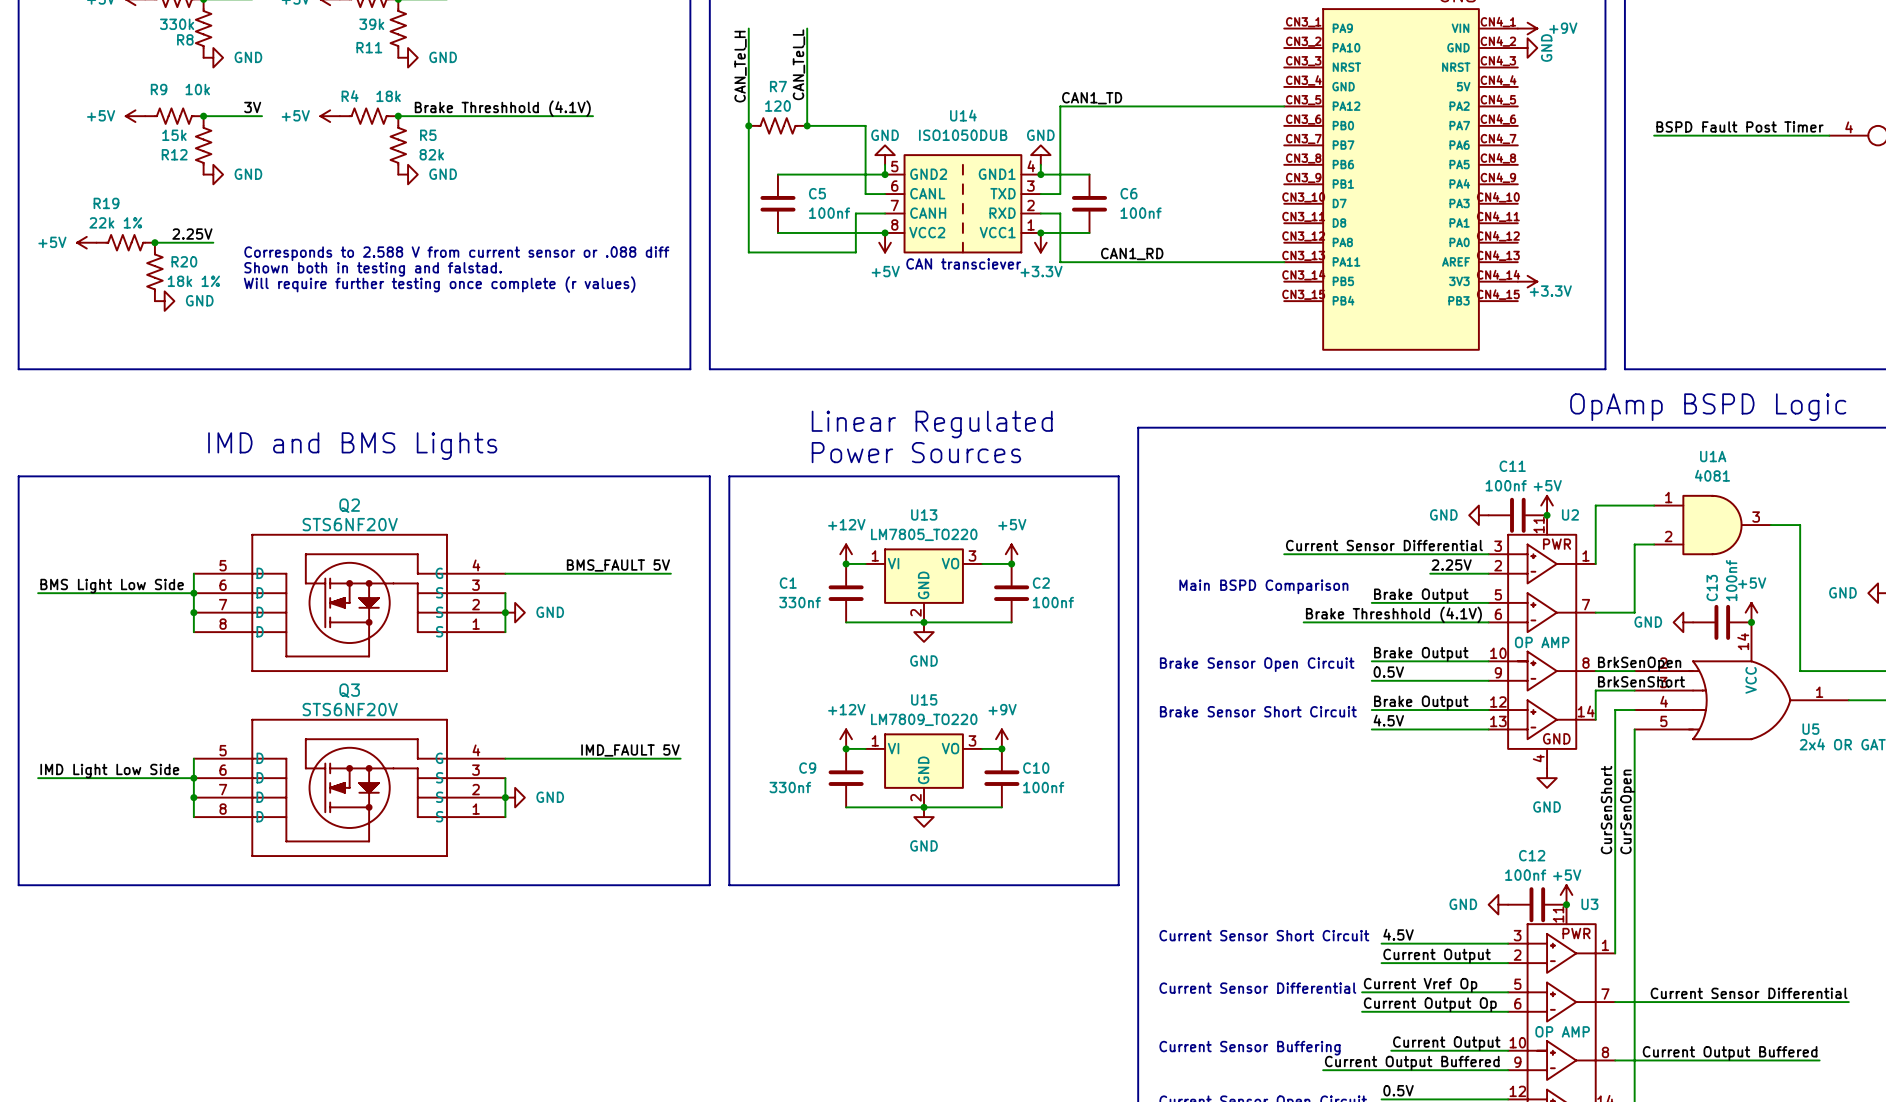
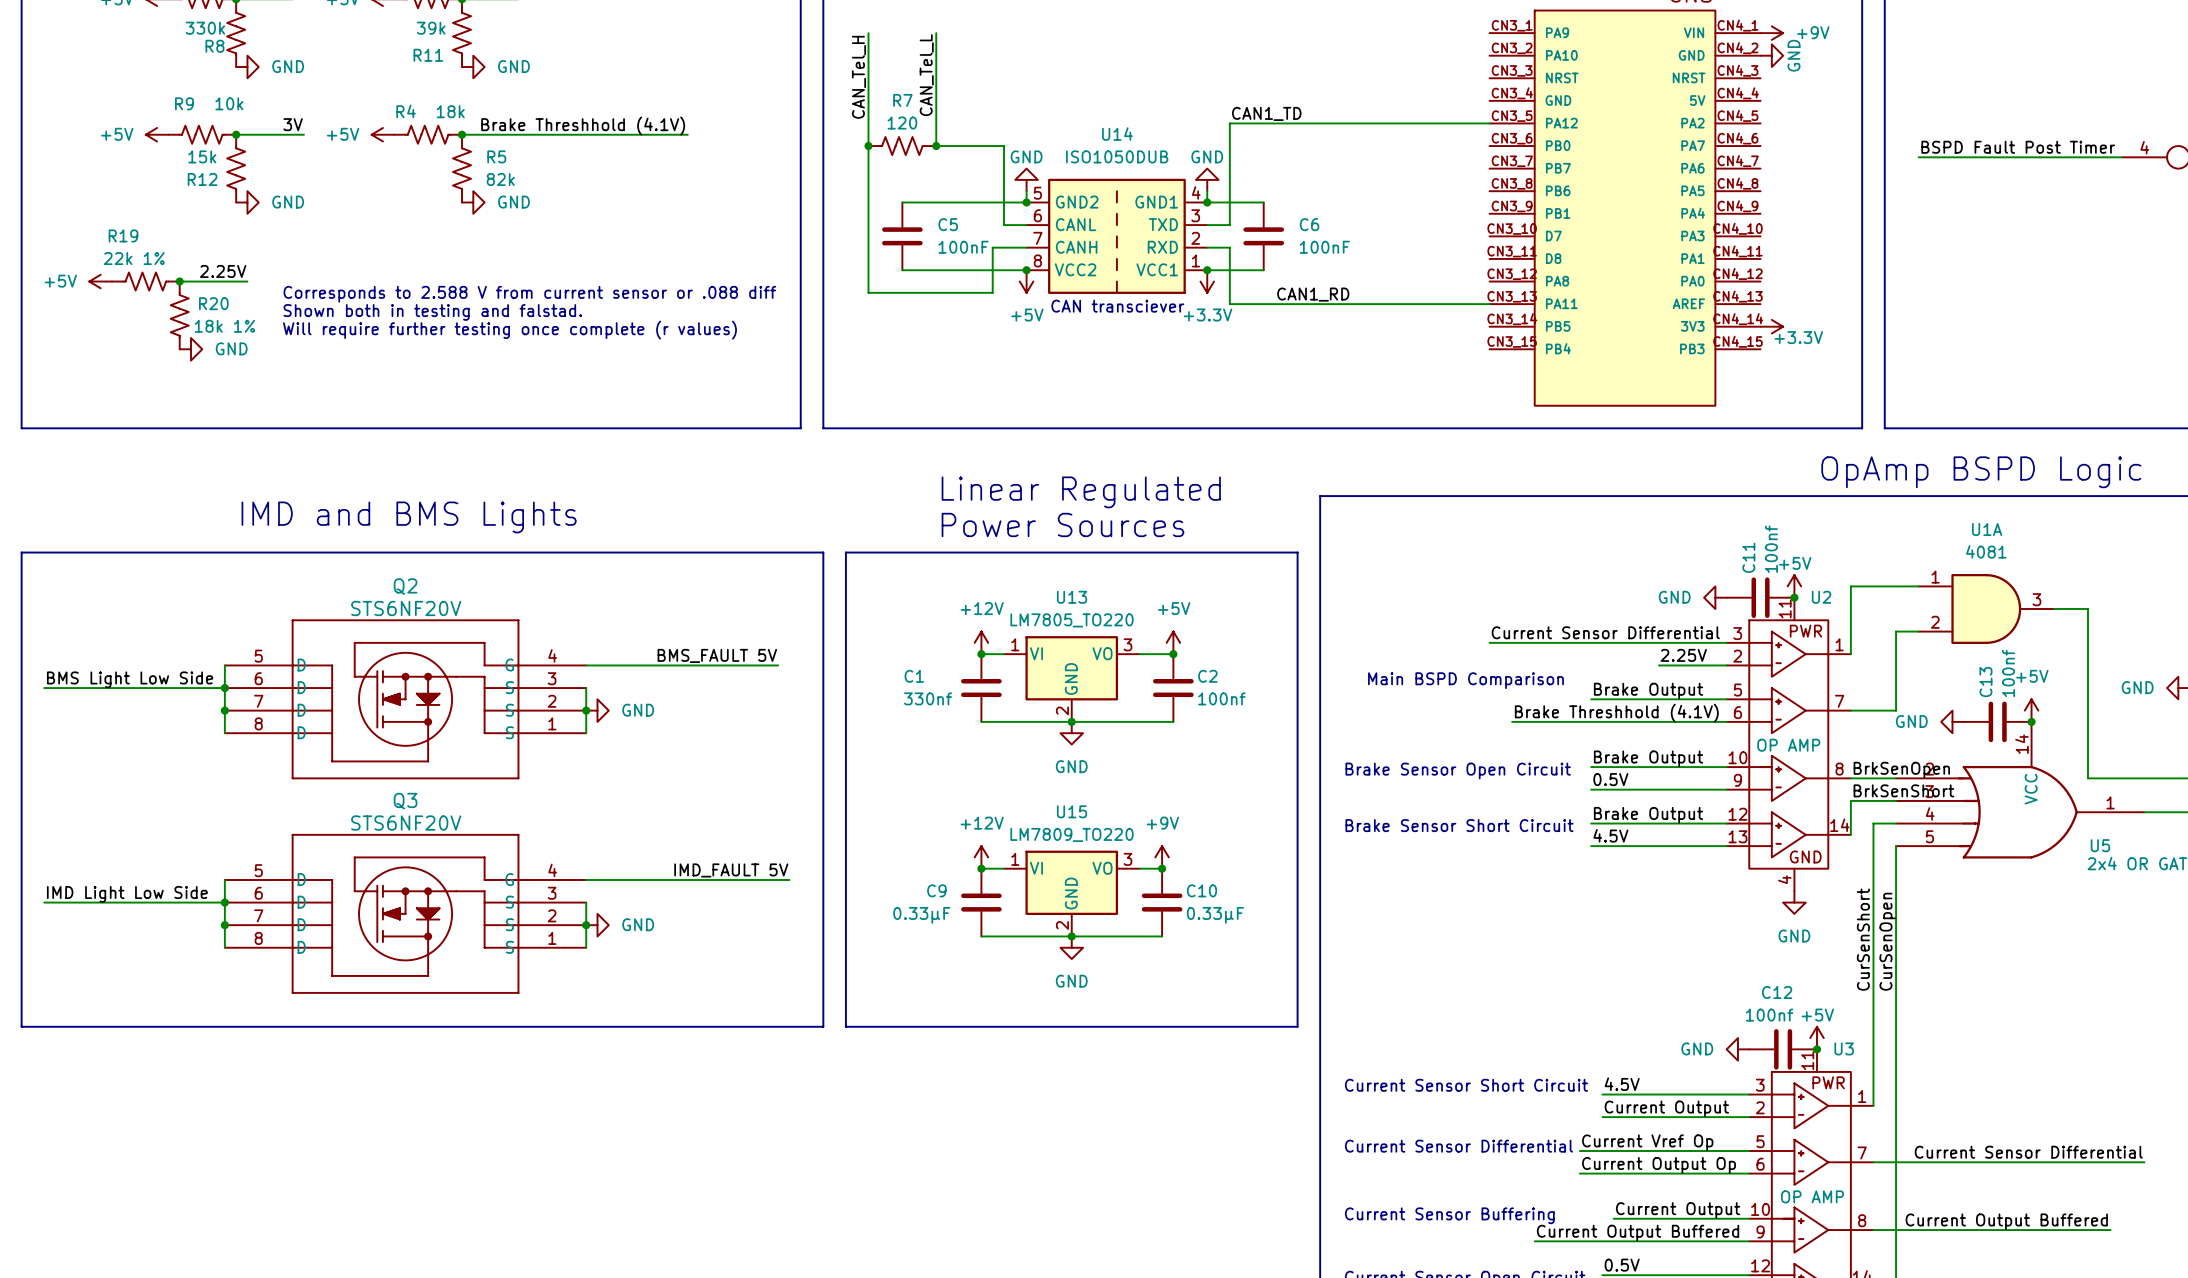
C5 value: 100nf (829, 213) -> 100nF (963, 247)
C6 value: 100nf (1141, 213) -> 100nF (1324, 247)
C11 name rotation: 0° (1512, 466) -> 90° counterclockwise (1748, 557)
C11 value rotation: 0° (1506, 485) -> 90° counterclockwise (1771, 549)
C9 value: 330nf (790, 787) -> 0.33µF (921, 915)
C10 value: 100nf (1043, 787) -> 0.33µF (1215, 915)

